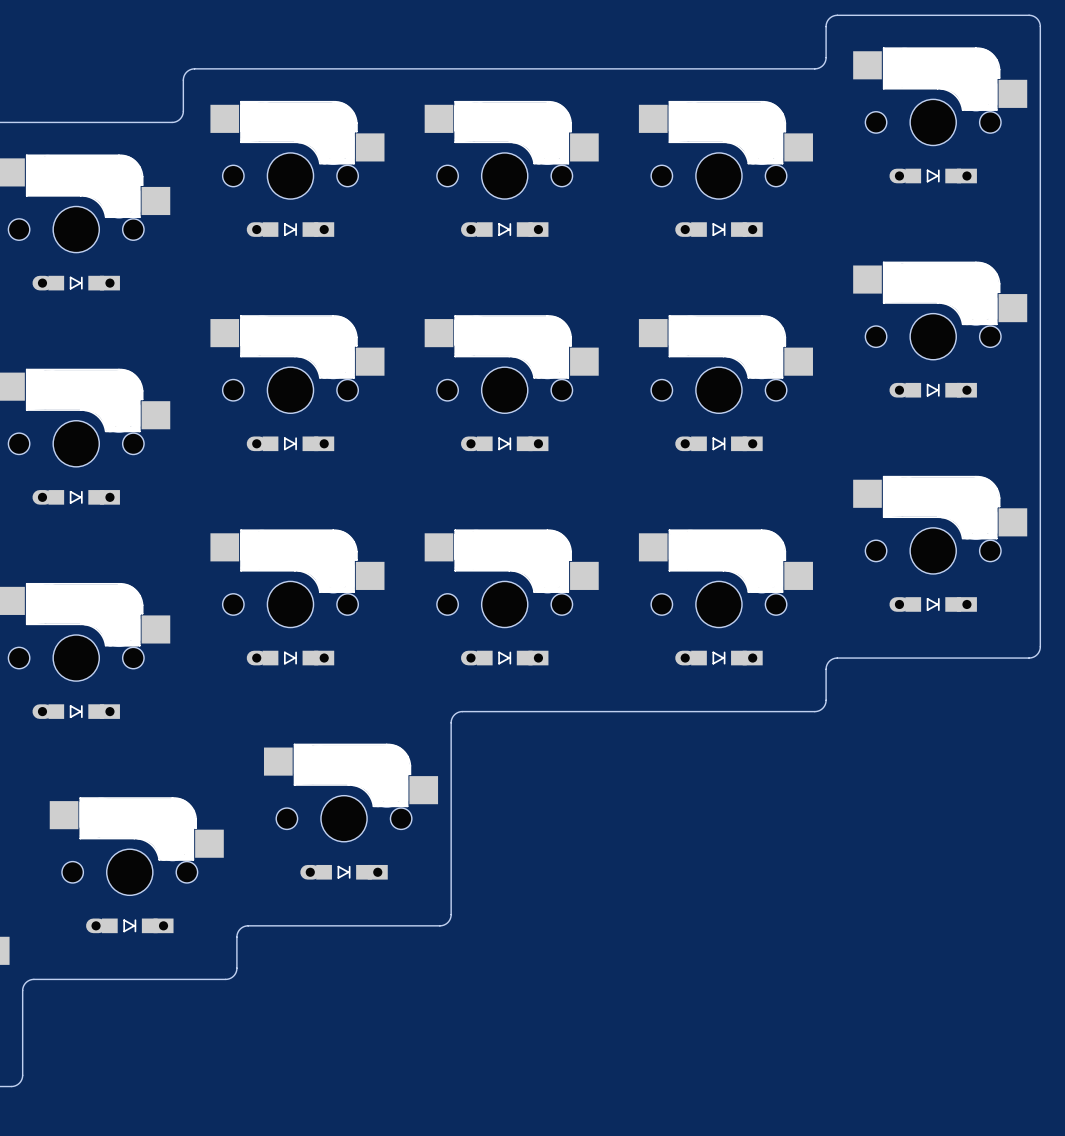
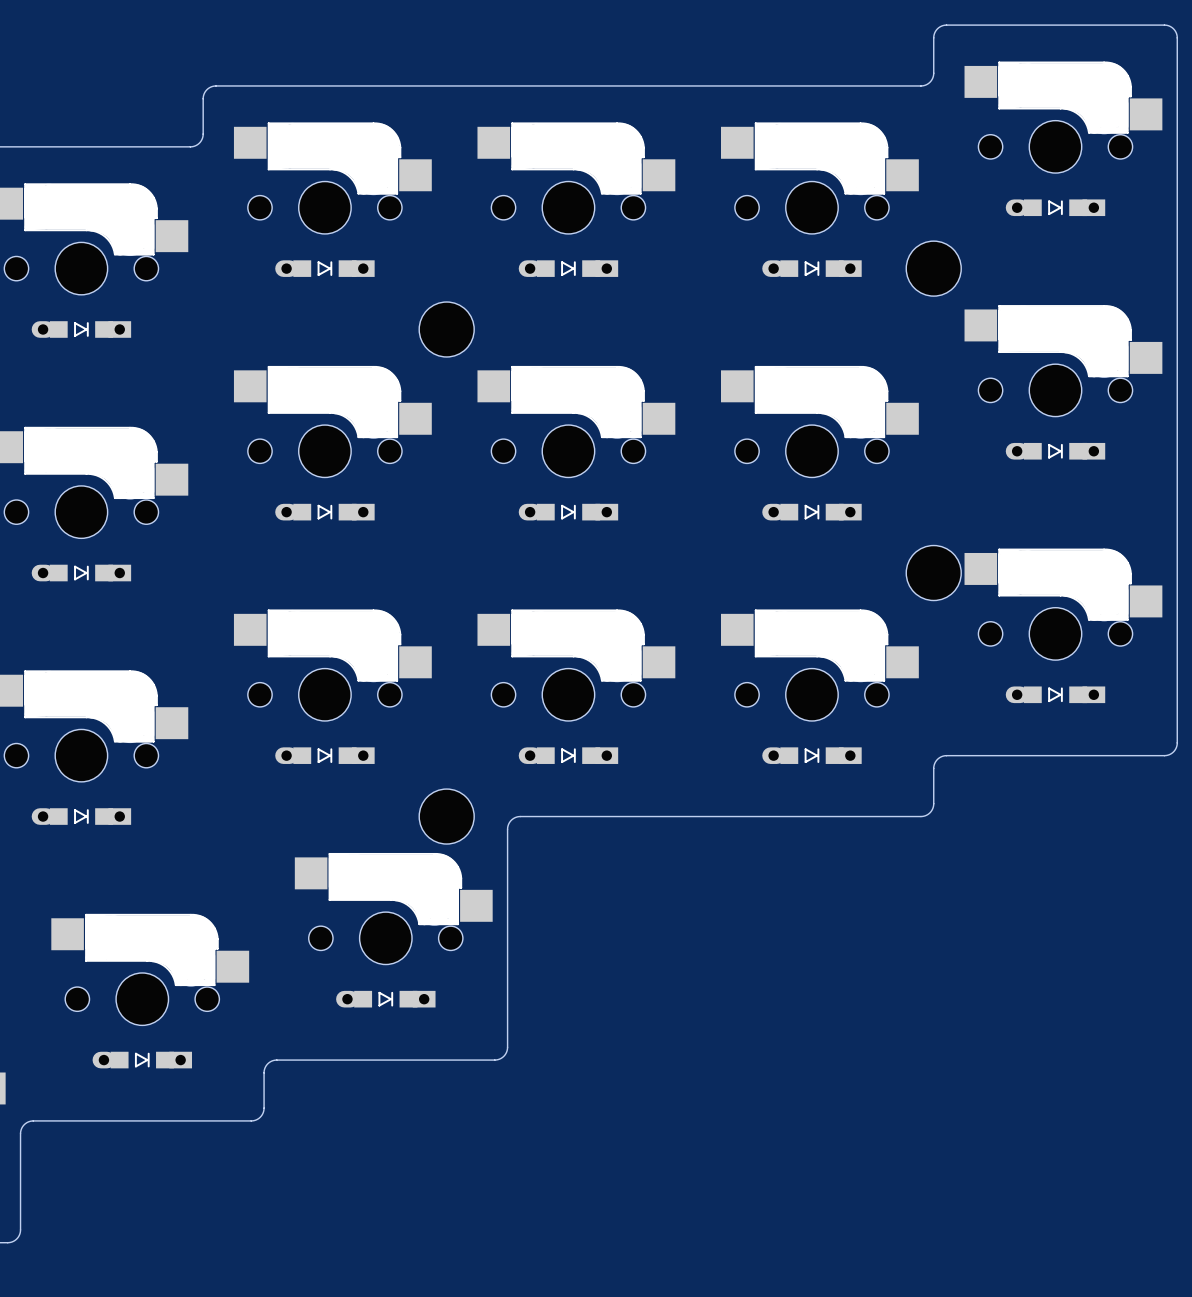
part: none -> (933, 268)
part: none -> (446, 329)
part: none -> (933, 573)
part: none -> (446, 816)

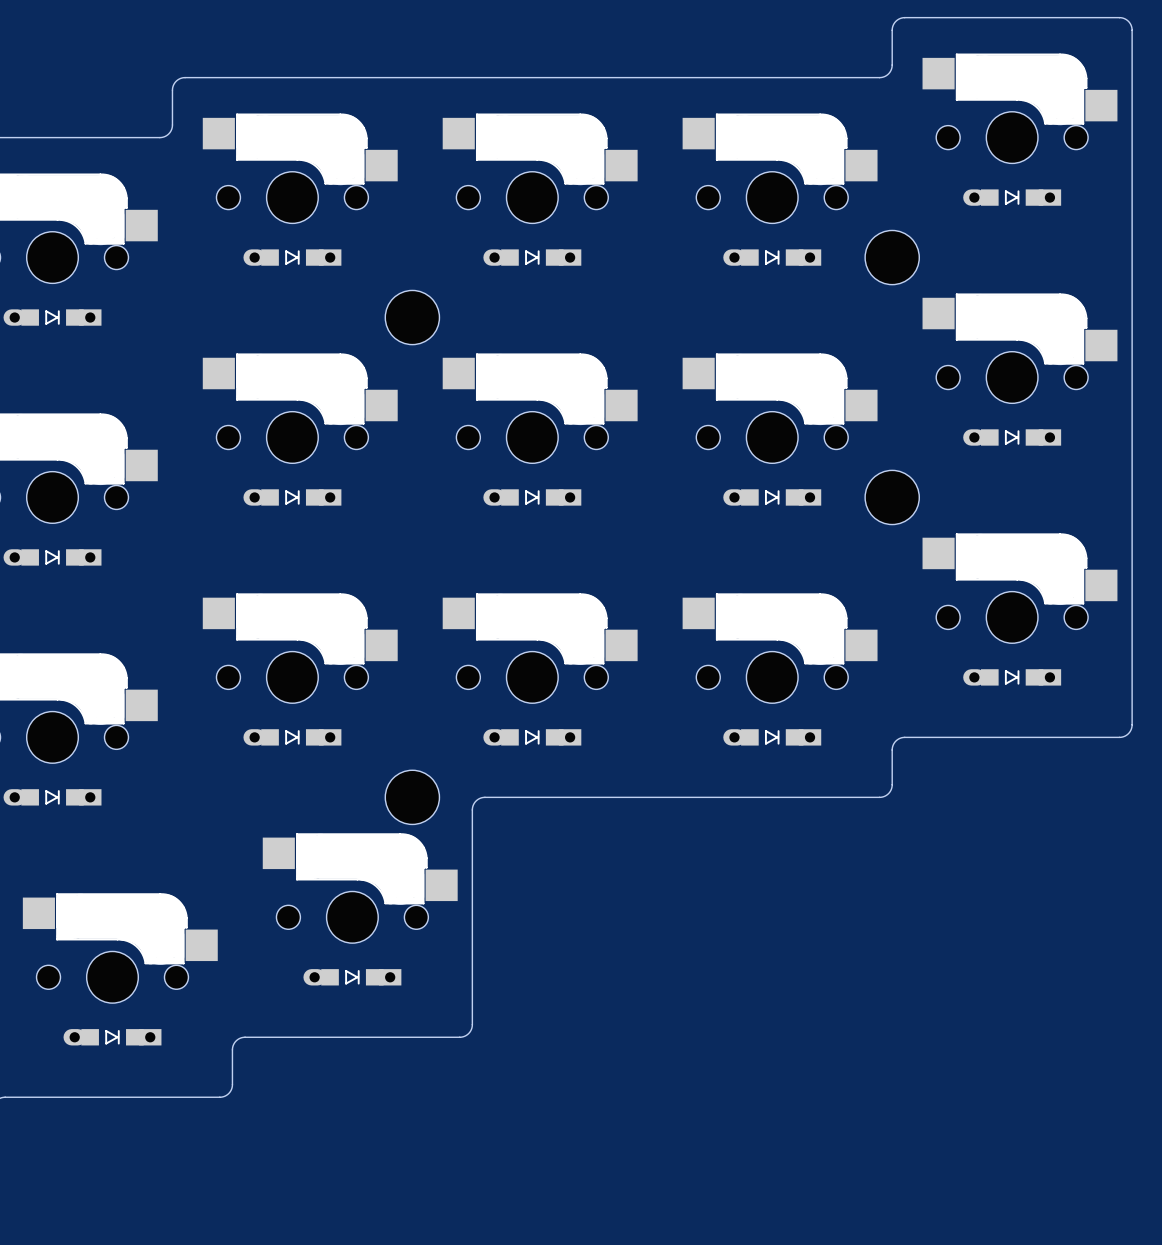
part position: (933, 573) -> (892, 497)

